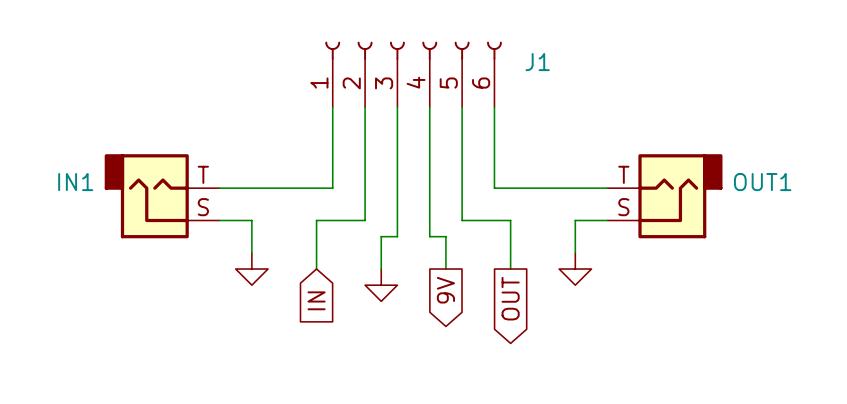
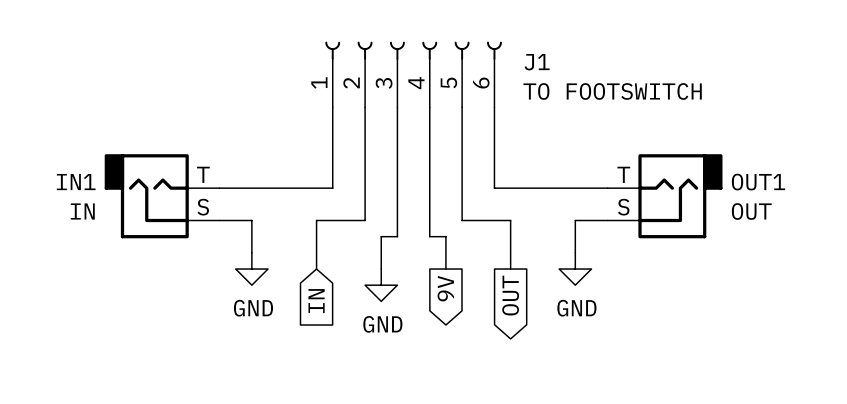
J1 value: none -> TO FOOTSWITCH (612, 91)
IN1 value: none -> IN (82, 211)
OUT1 value: none -> OUT (751, 211)
power symbol text: none -> GND (253, 308)
power symbol text: none -> GND (576, 308)
power symbol text: none -> GND (382, 324)

